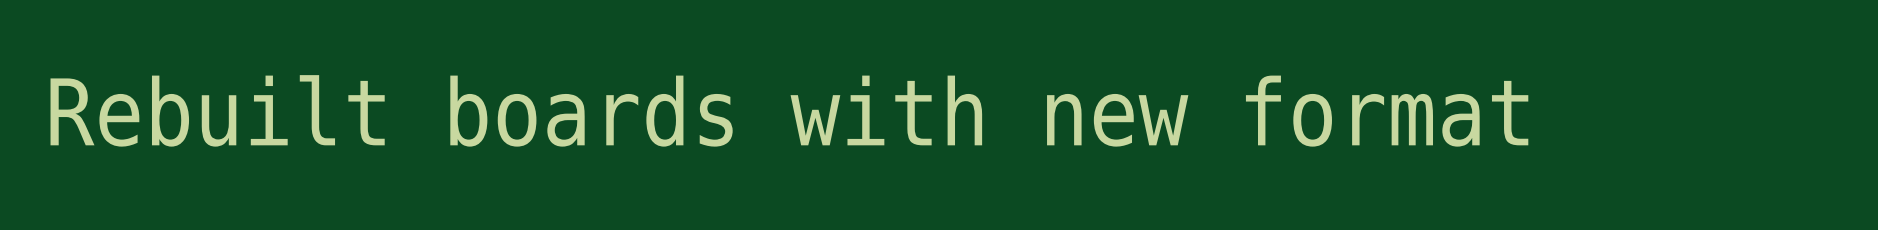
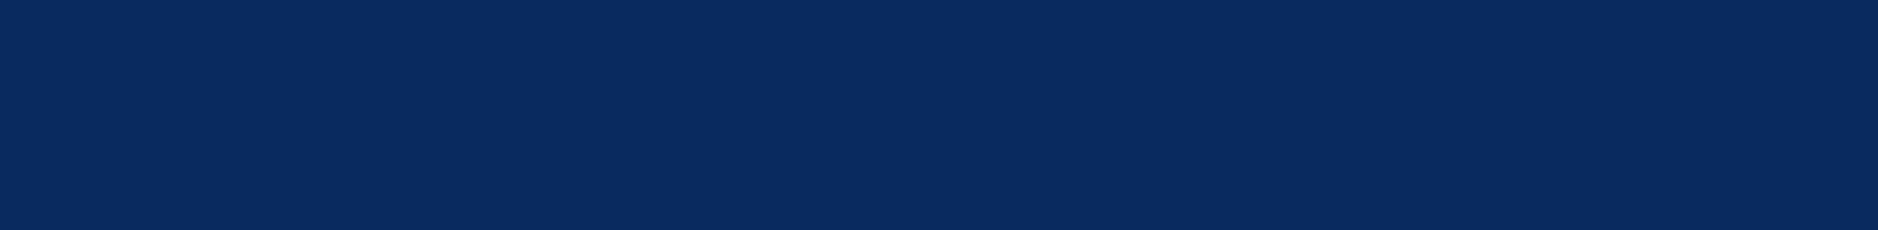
text: Rebuilt boards with new format (789, 110) -> none

